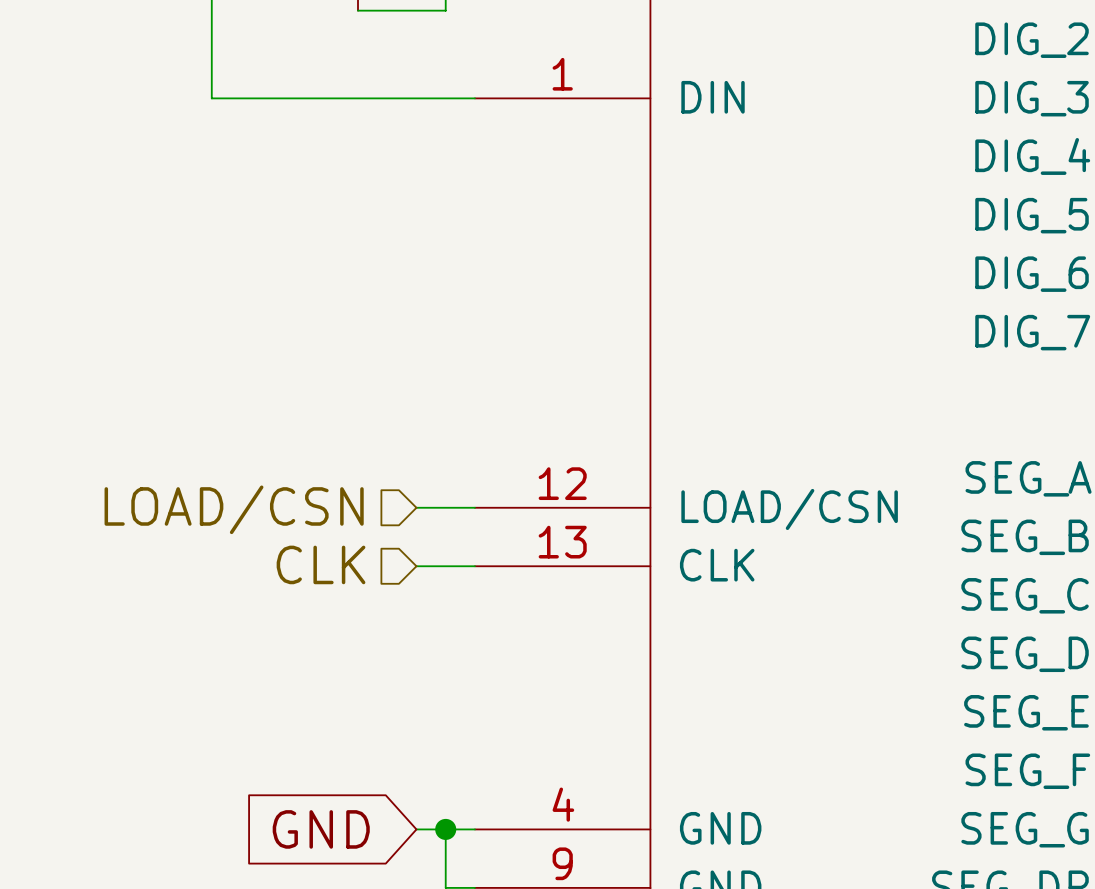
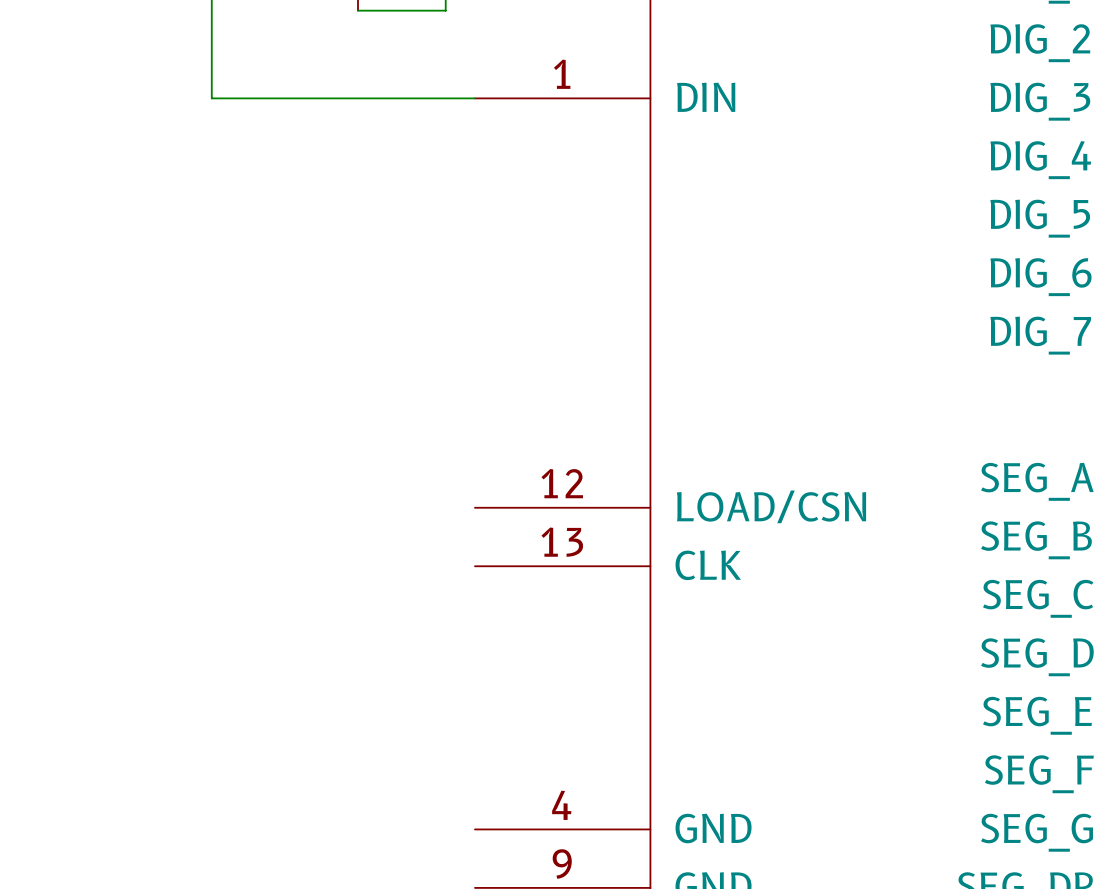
wire: (416, 507) (474, 507) -> none
hierarchical label: LOAD/CSN (234, 509) -> none
hierarchical label: CLK (321, 564) -> none
wire: (416, 566) (474, 566) -> none
global label: GND (321, 829) -> none
wire: (416, 829) (474, 829) -> none
wire: (445, 829) (445, 887) (474, 887) -> none
junction: (445, 829) -> none

